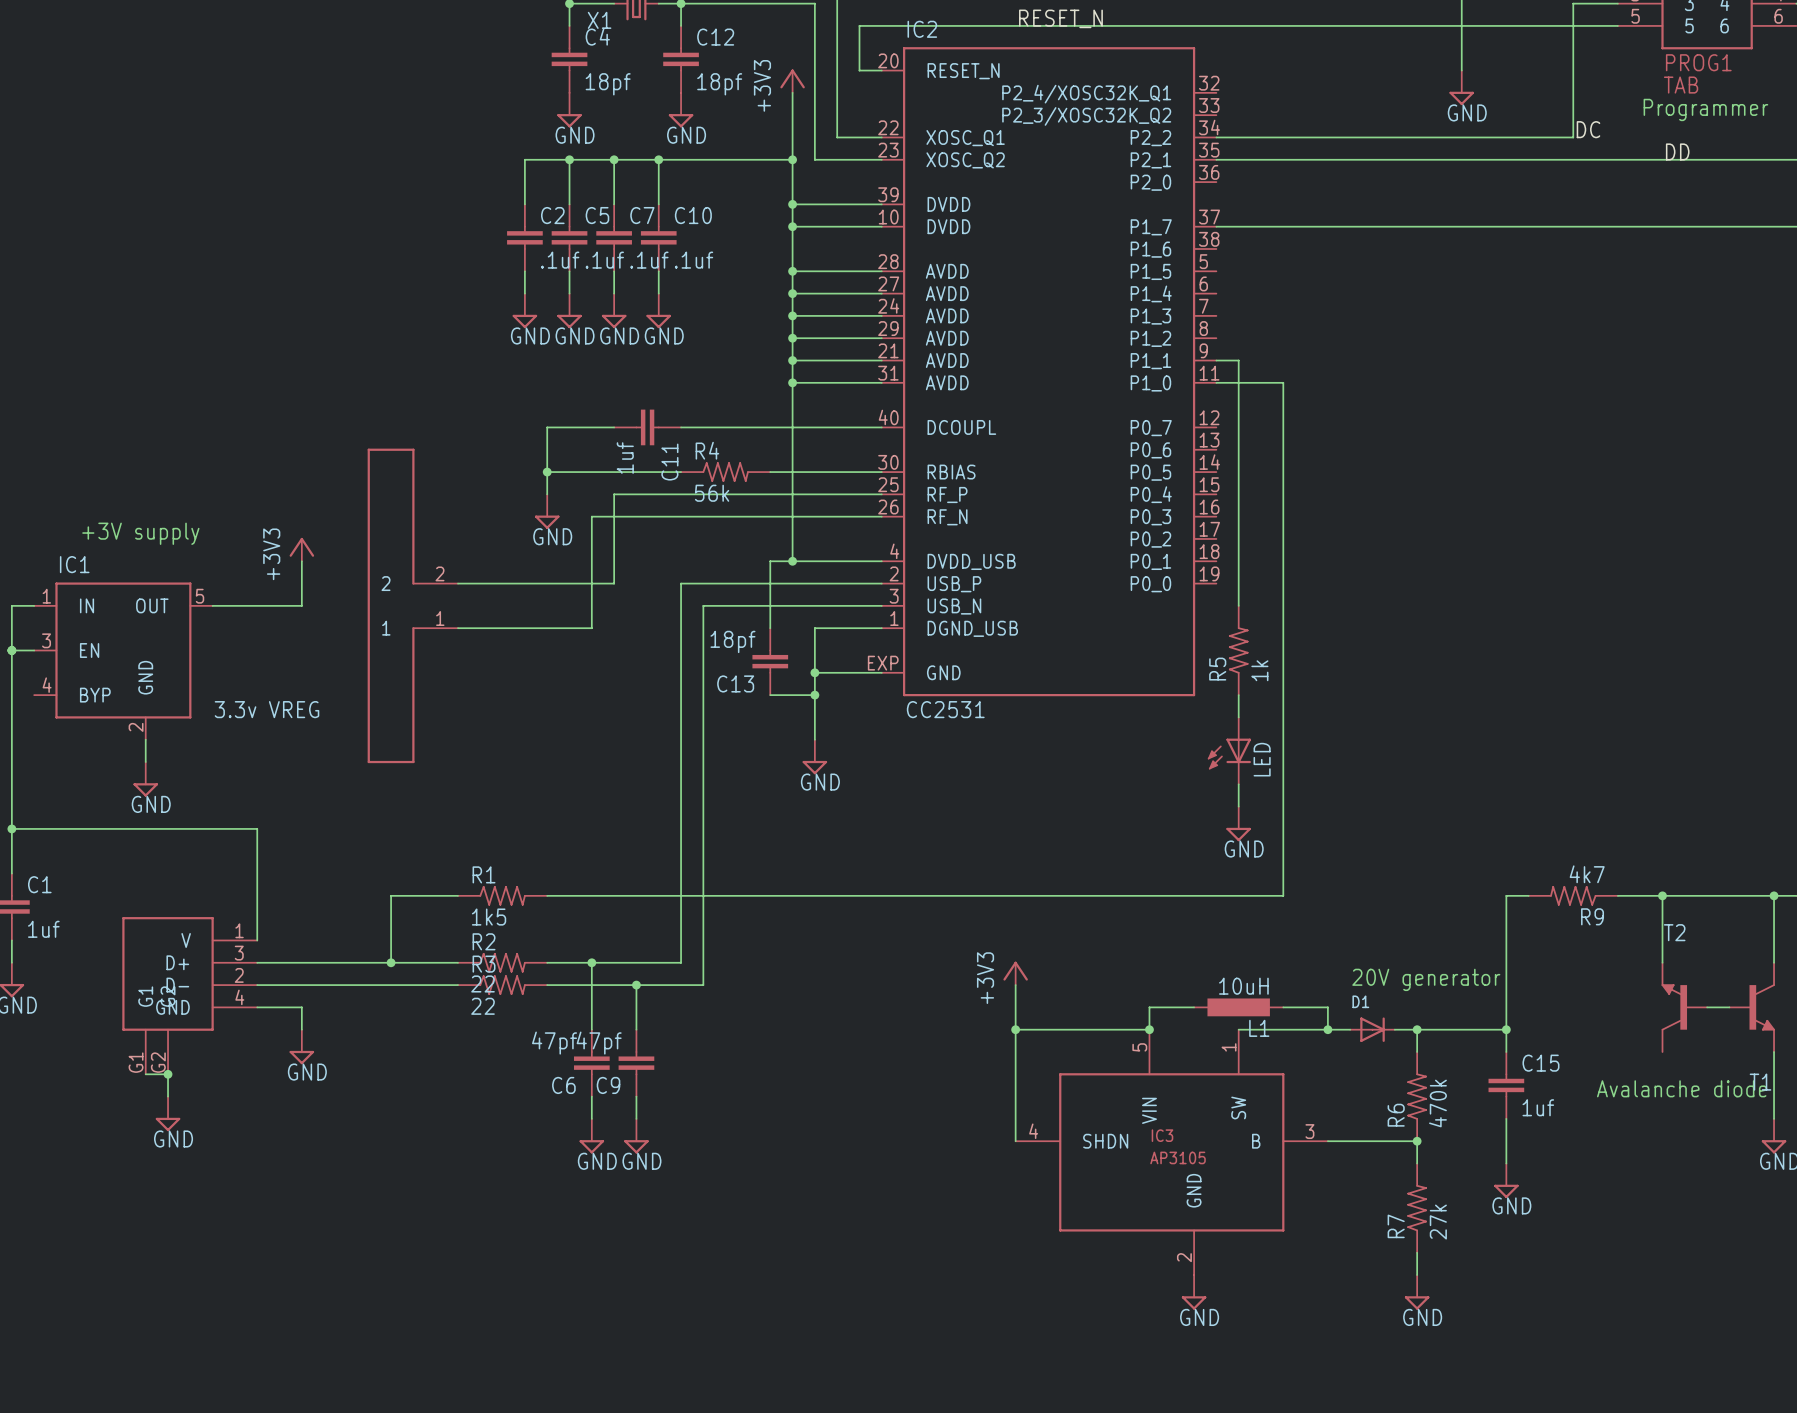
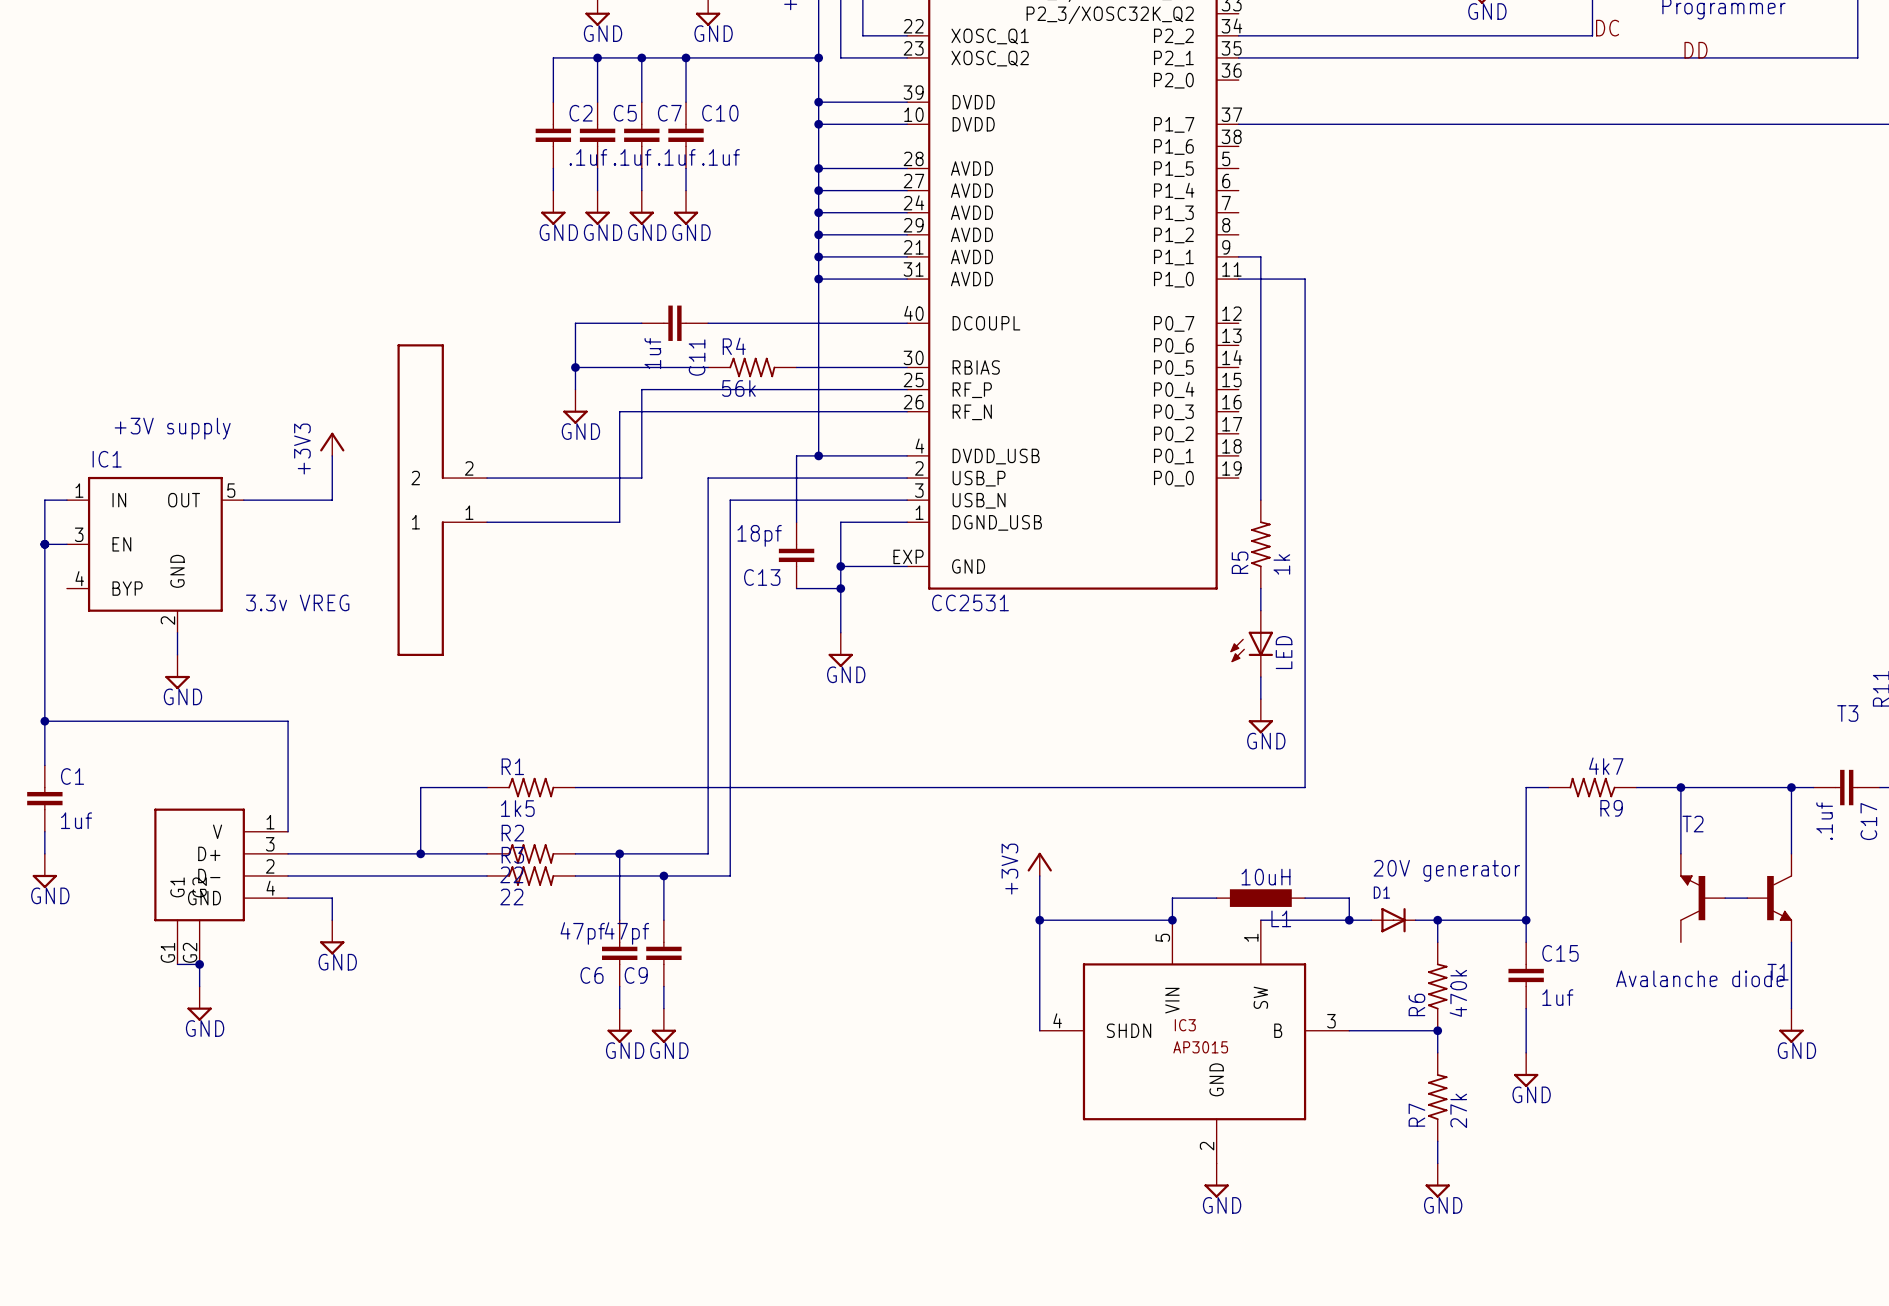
IC3 value: AP3105 (1178, 1157) -> AP3015 (1200, 1047)

